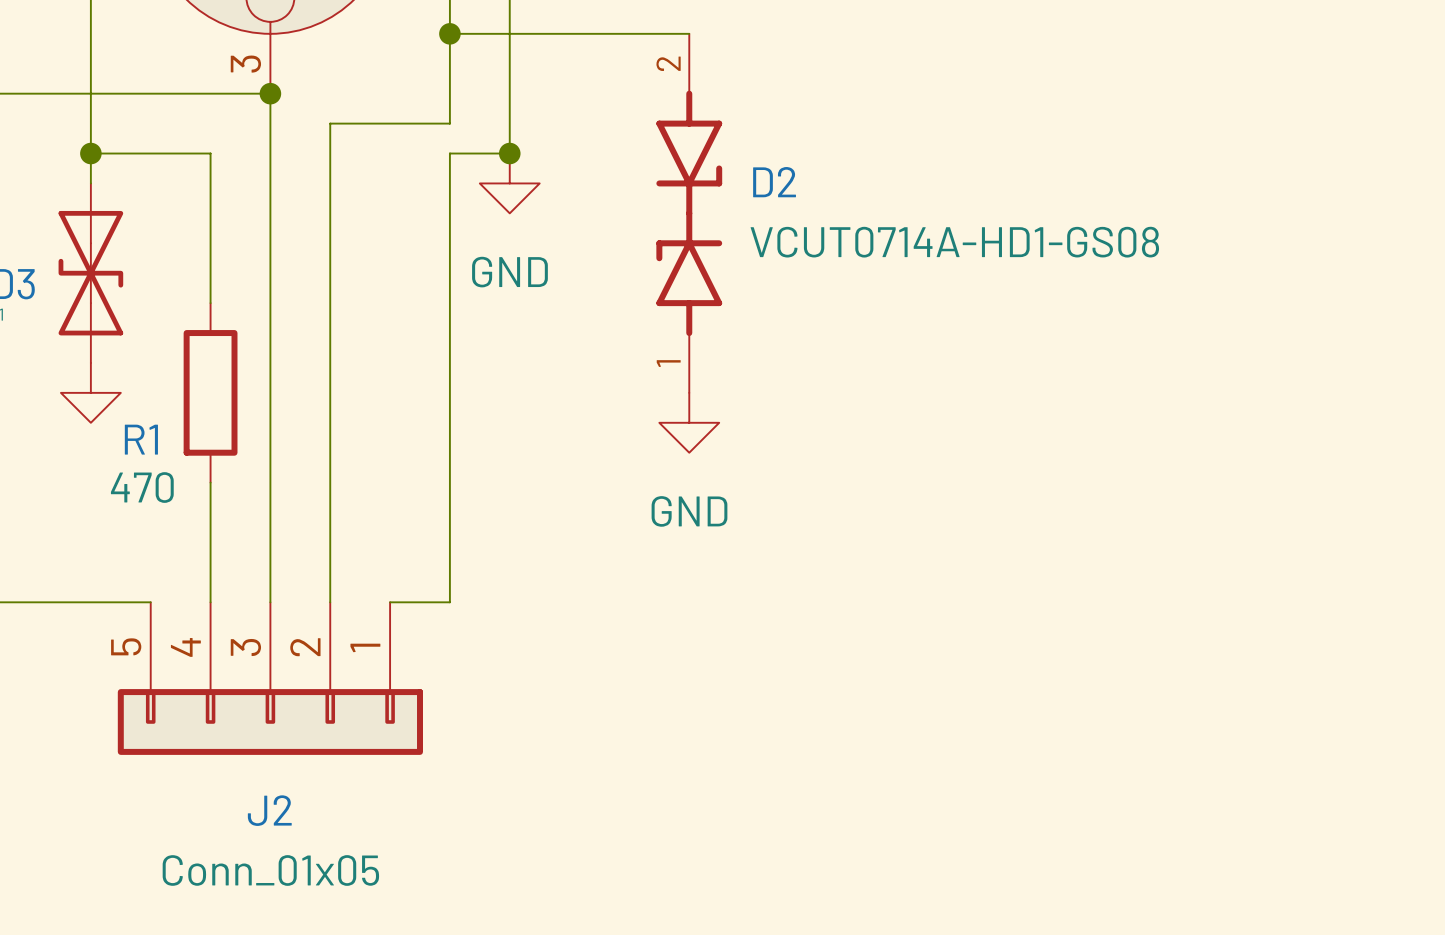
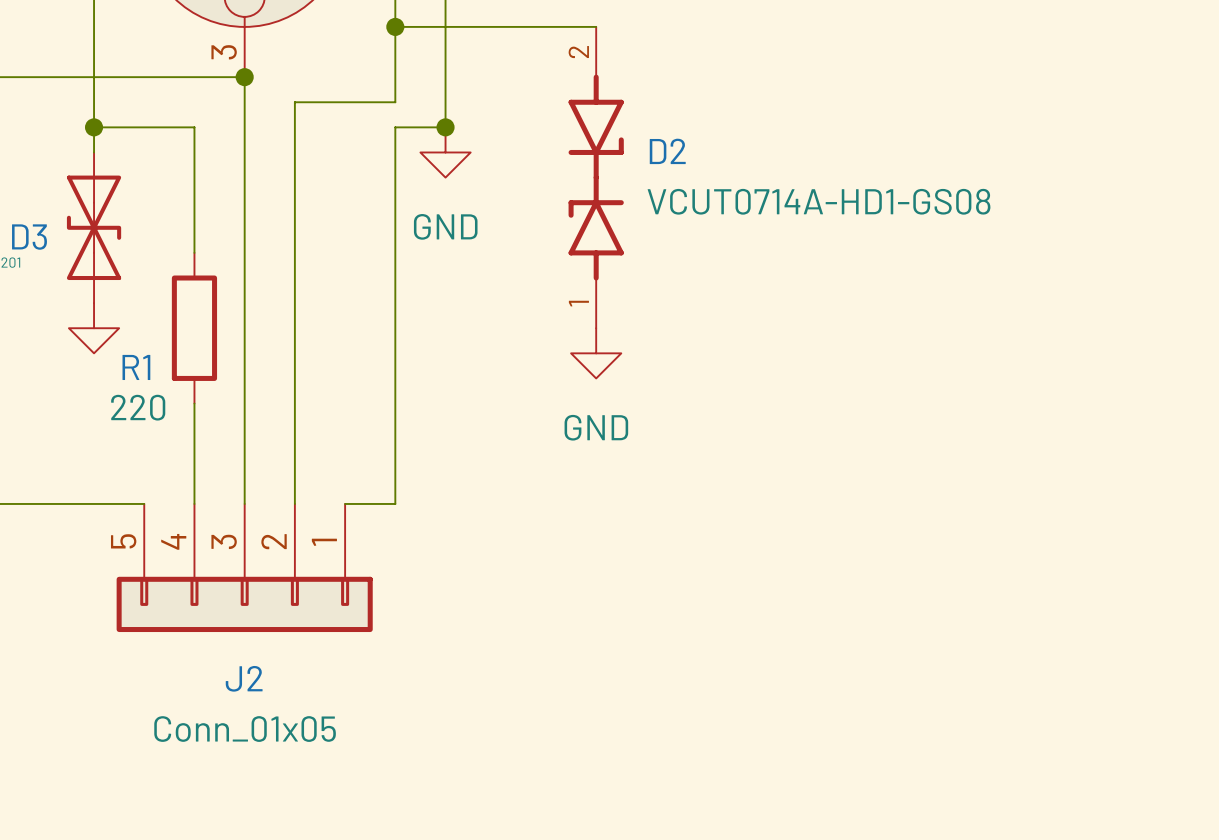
R1 value: 470 (142, 487) -> 220 (138, 407)

